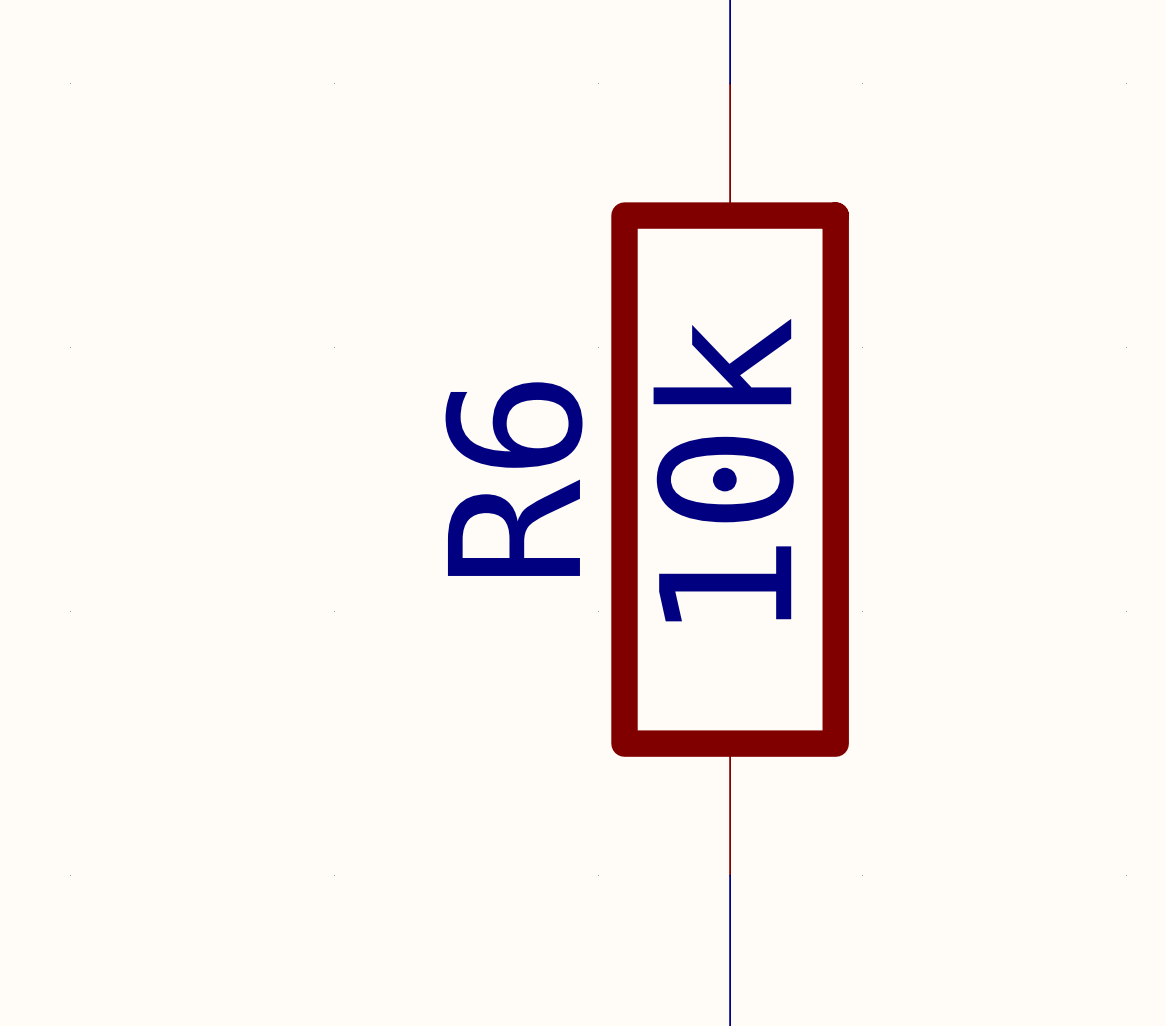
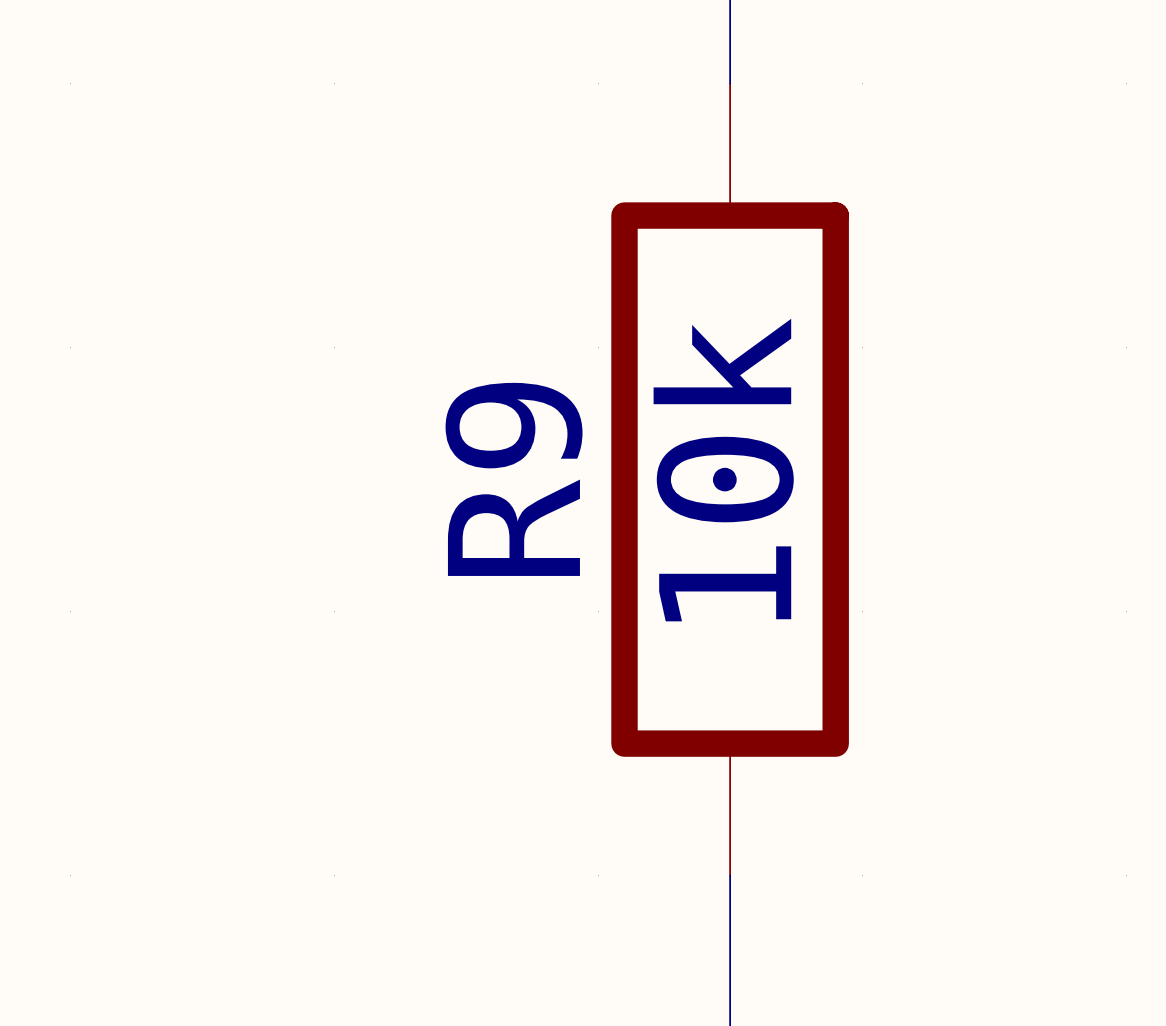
R6 name: R6 (514, 479) -> R9 (514, 479)

